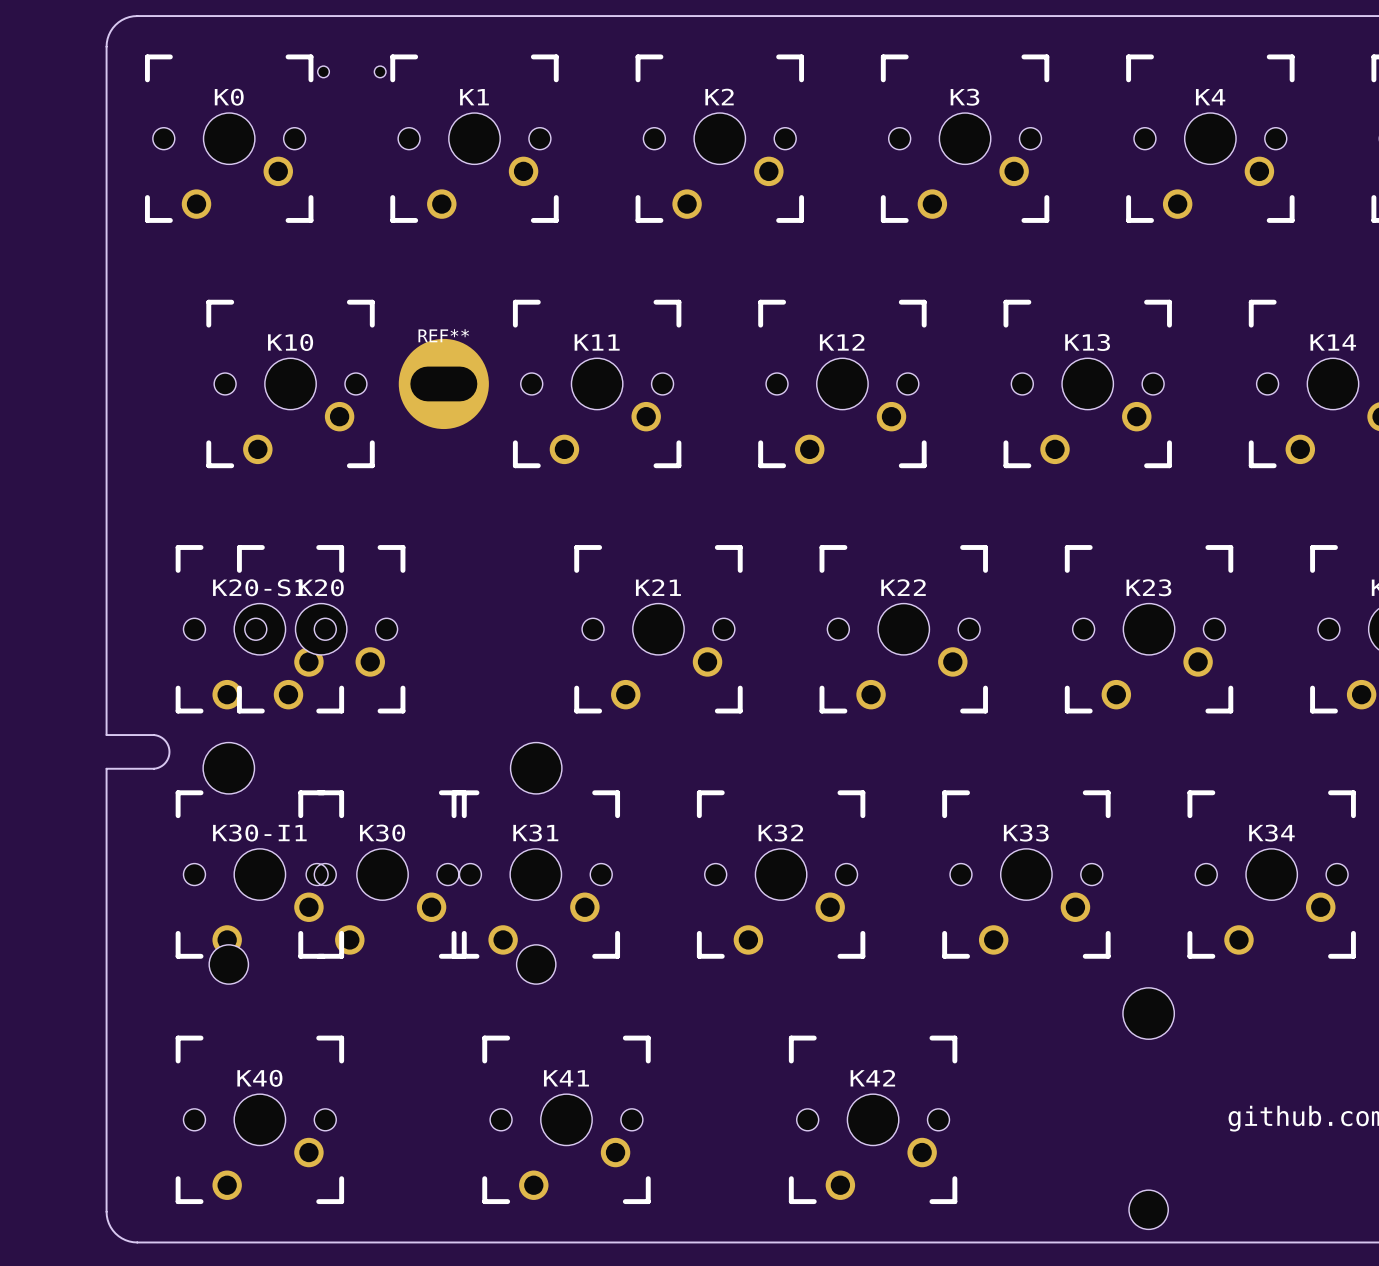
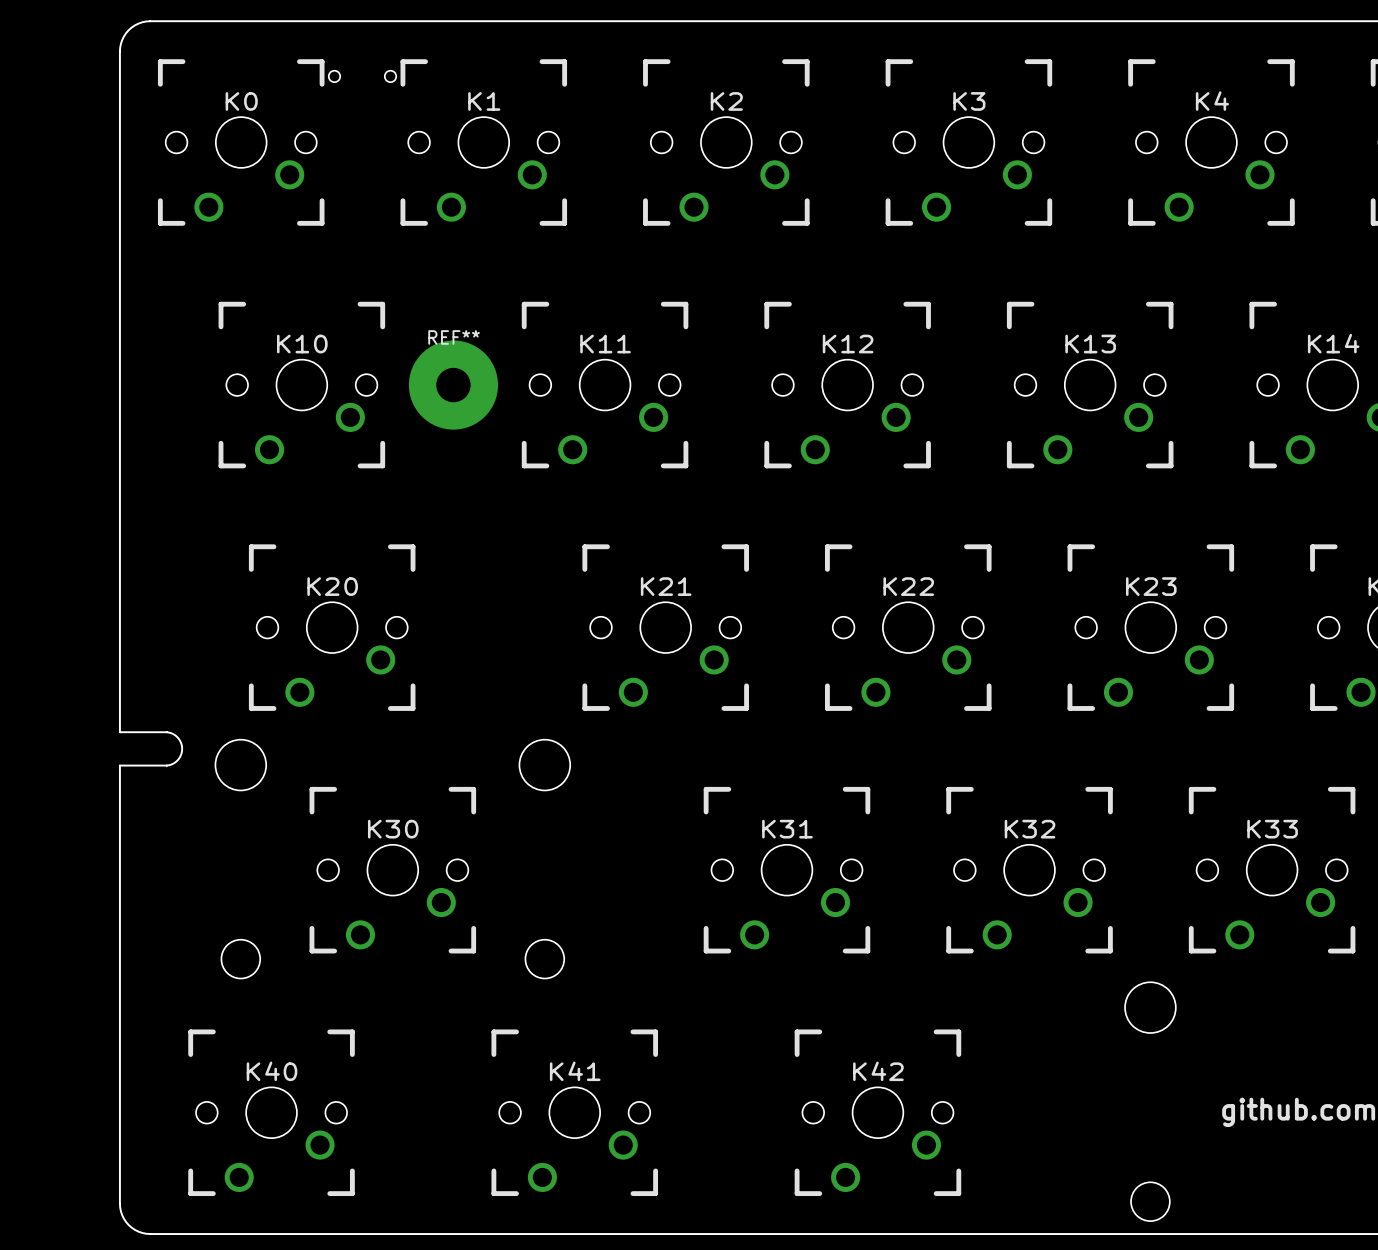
REF** footprint: [398, 338, 489, 430] -> [408, 340, 499, 430]
K20-S1: (259, 629) -> none
K32 name: K32 (780, 833) -> K31 (787, 829)
K33 name: K33 (1026, 833) -> K32 (1030, 829)
K34 name: K34 (1271, 833) -> K33 (1272, 829)
K30-I1: (259, 874) -> none
K31: (535, 874) -> none

